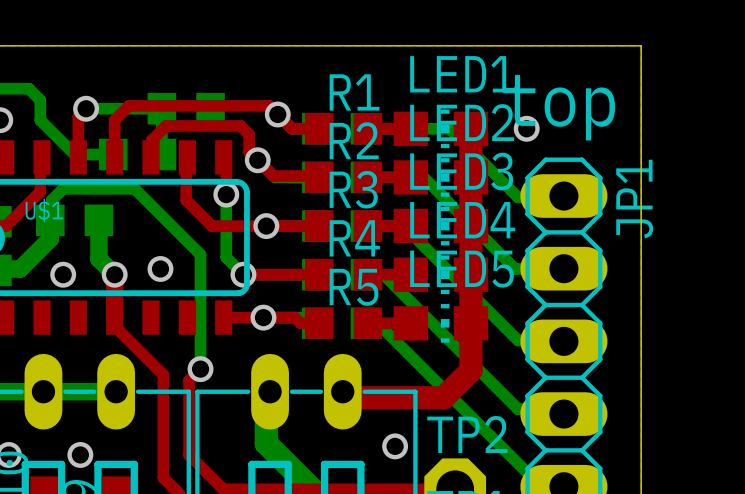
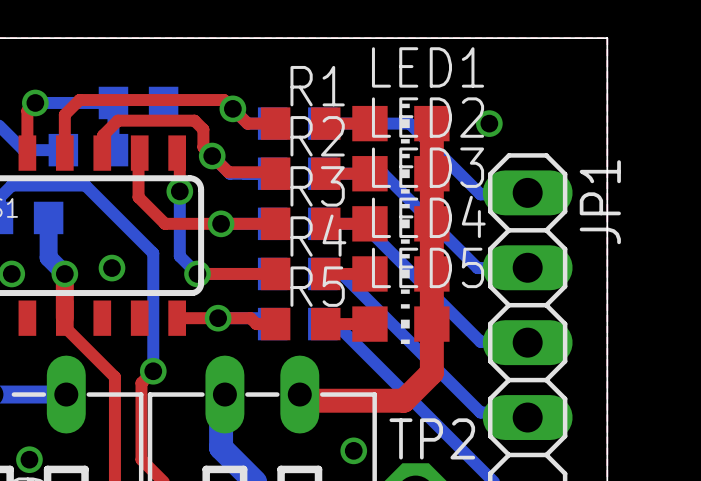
text: top (559, 107) -> none

